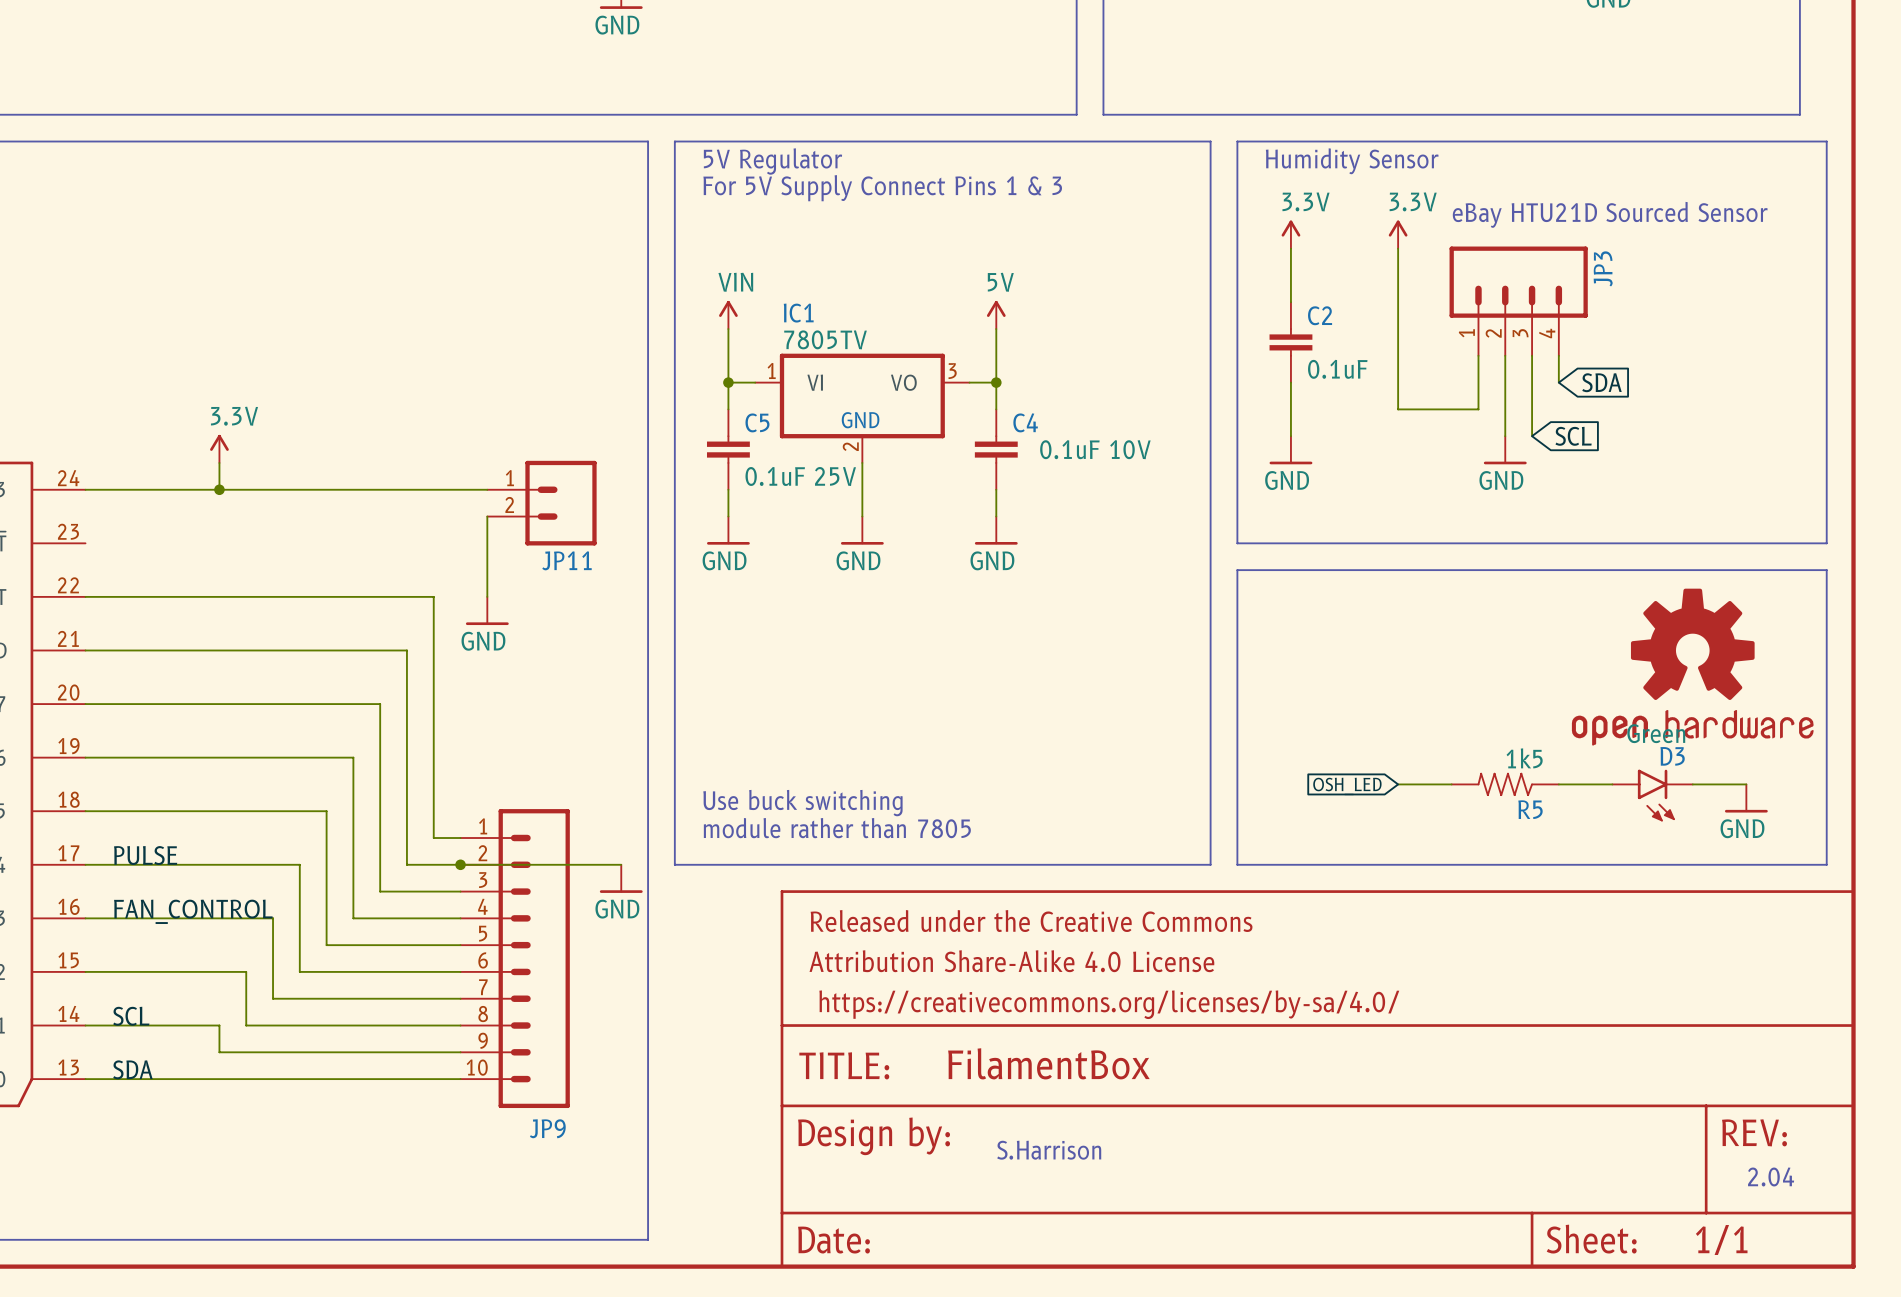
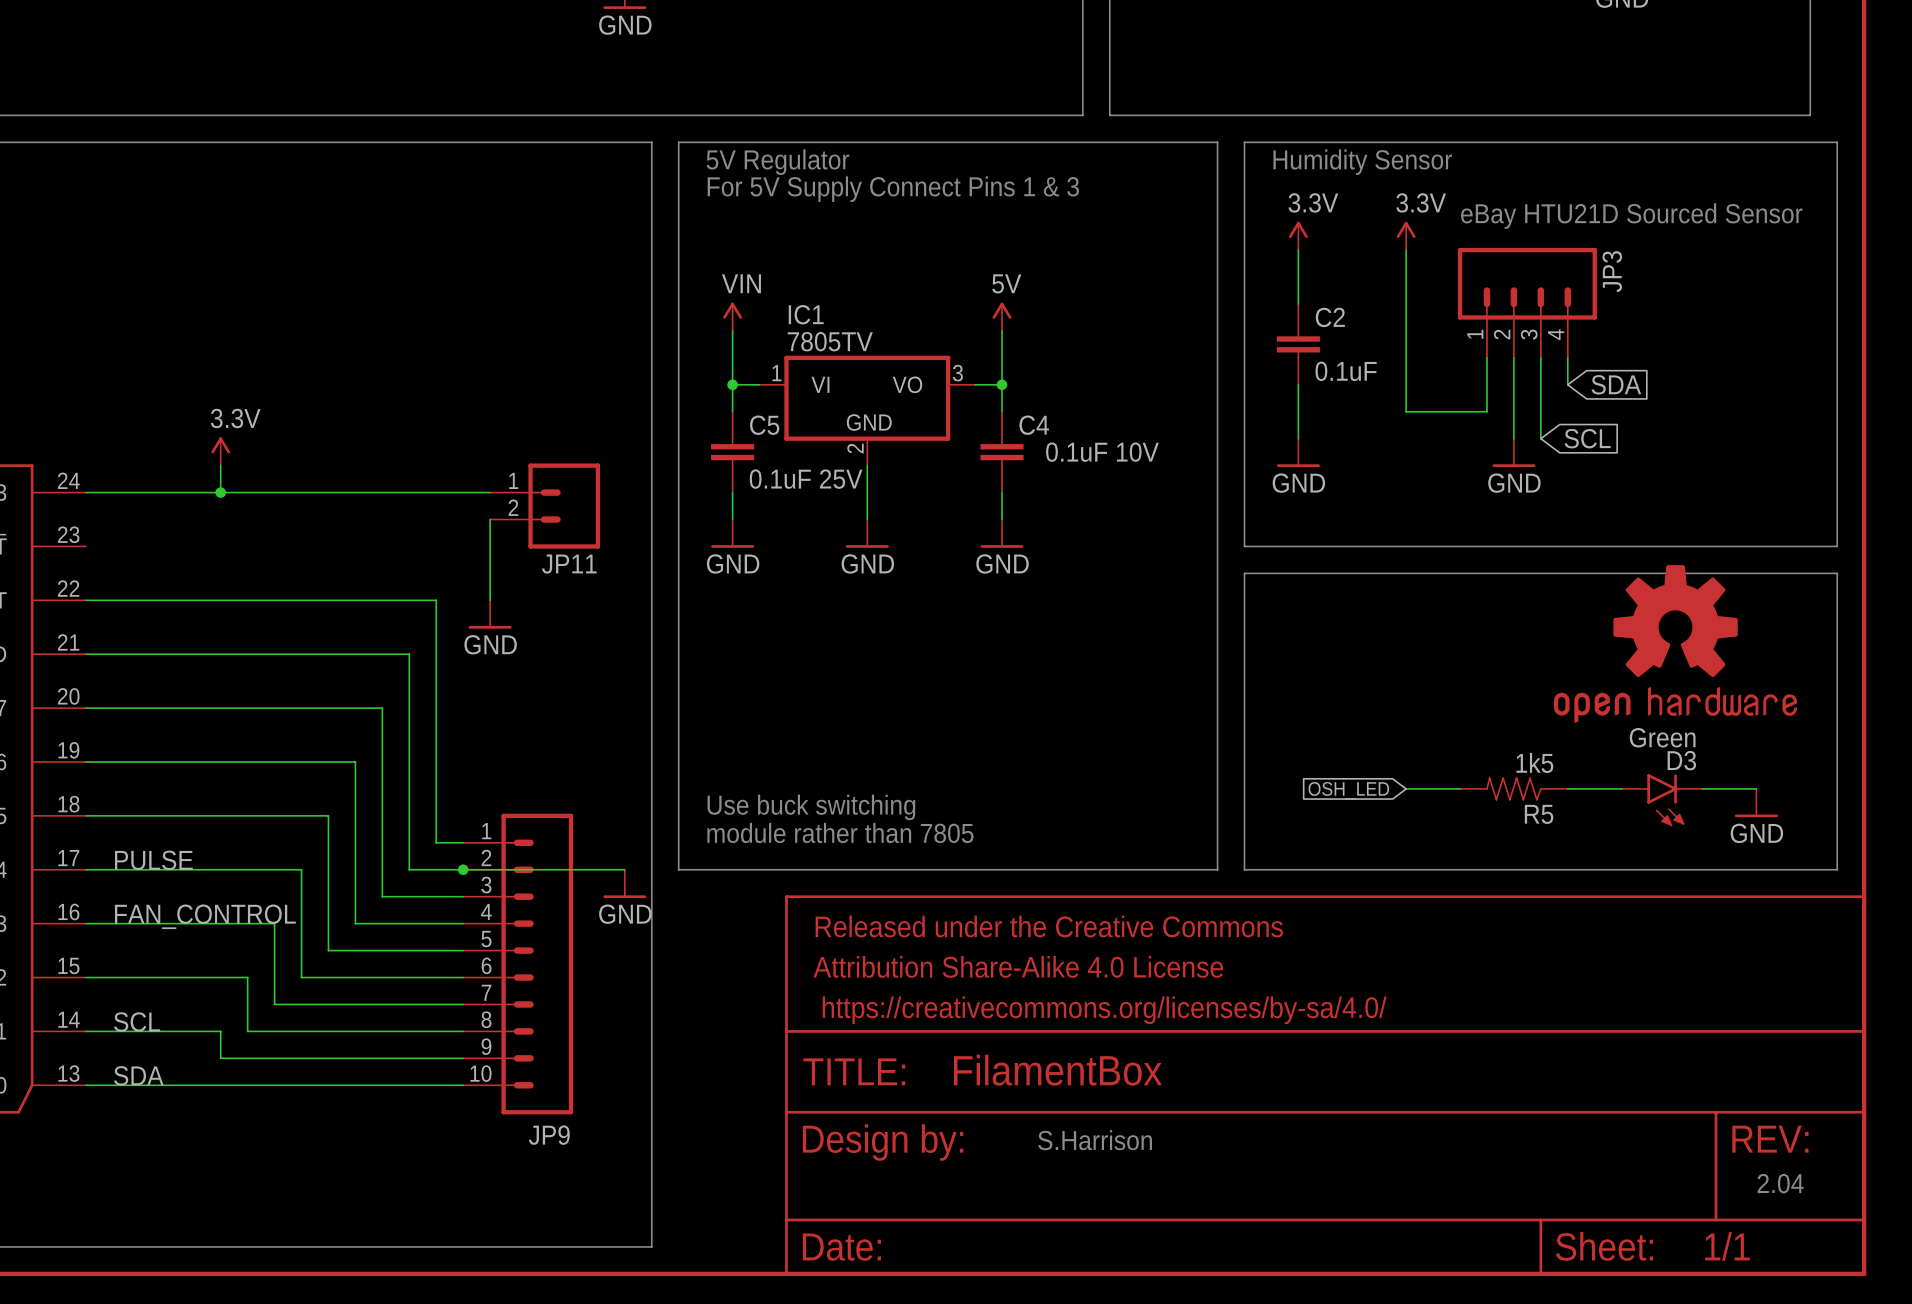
part position: (1692, 667) -> (1675, 643)
text position: S.Harrison (1049, 1150) -> S.Harrison (1095, 1140)

